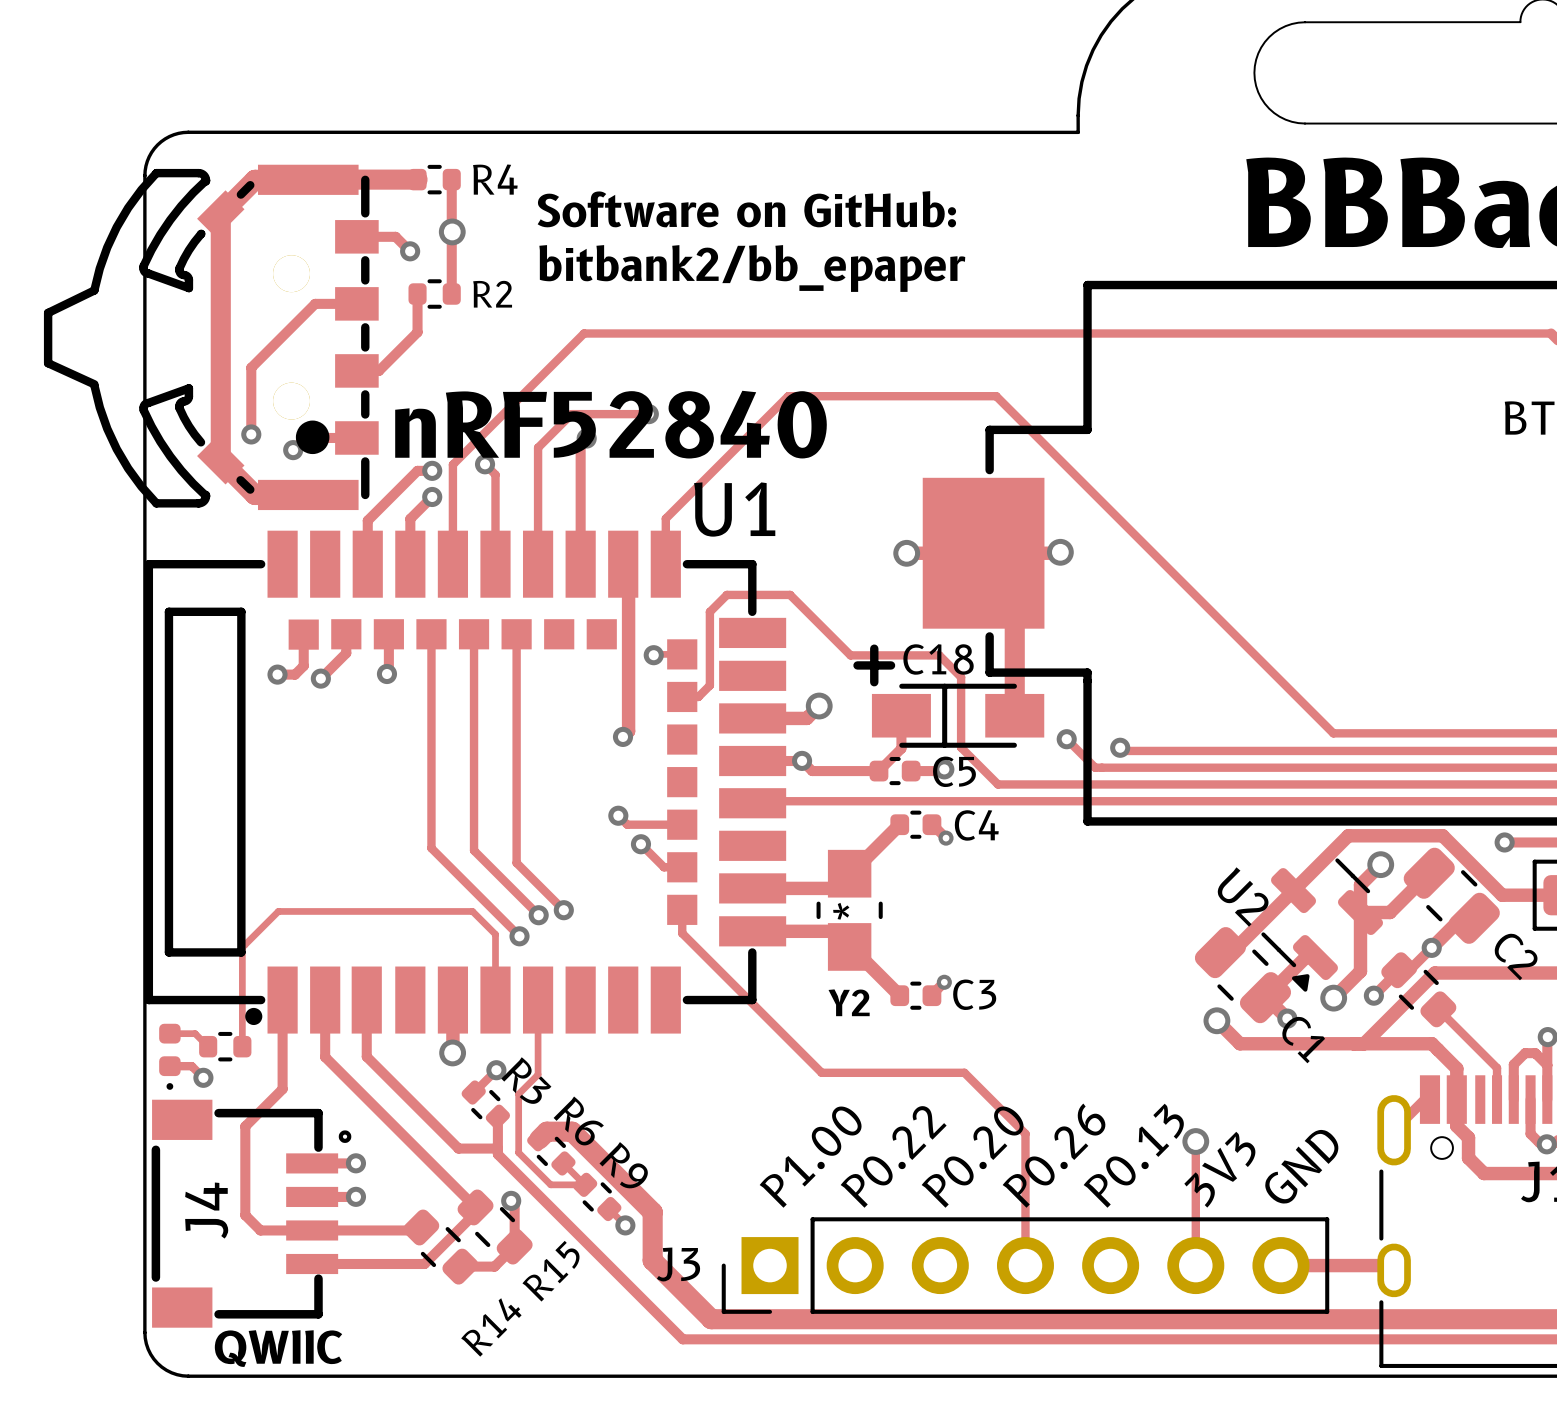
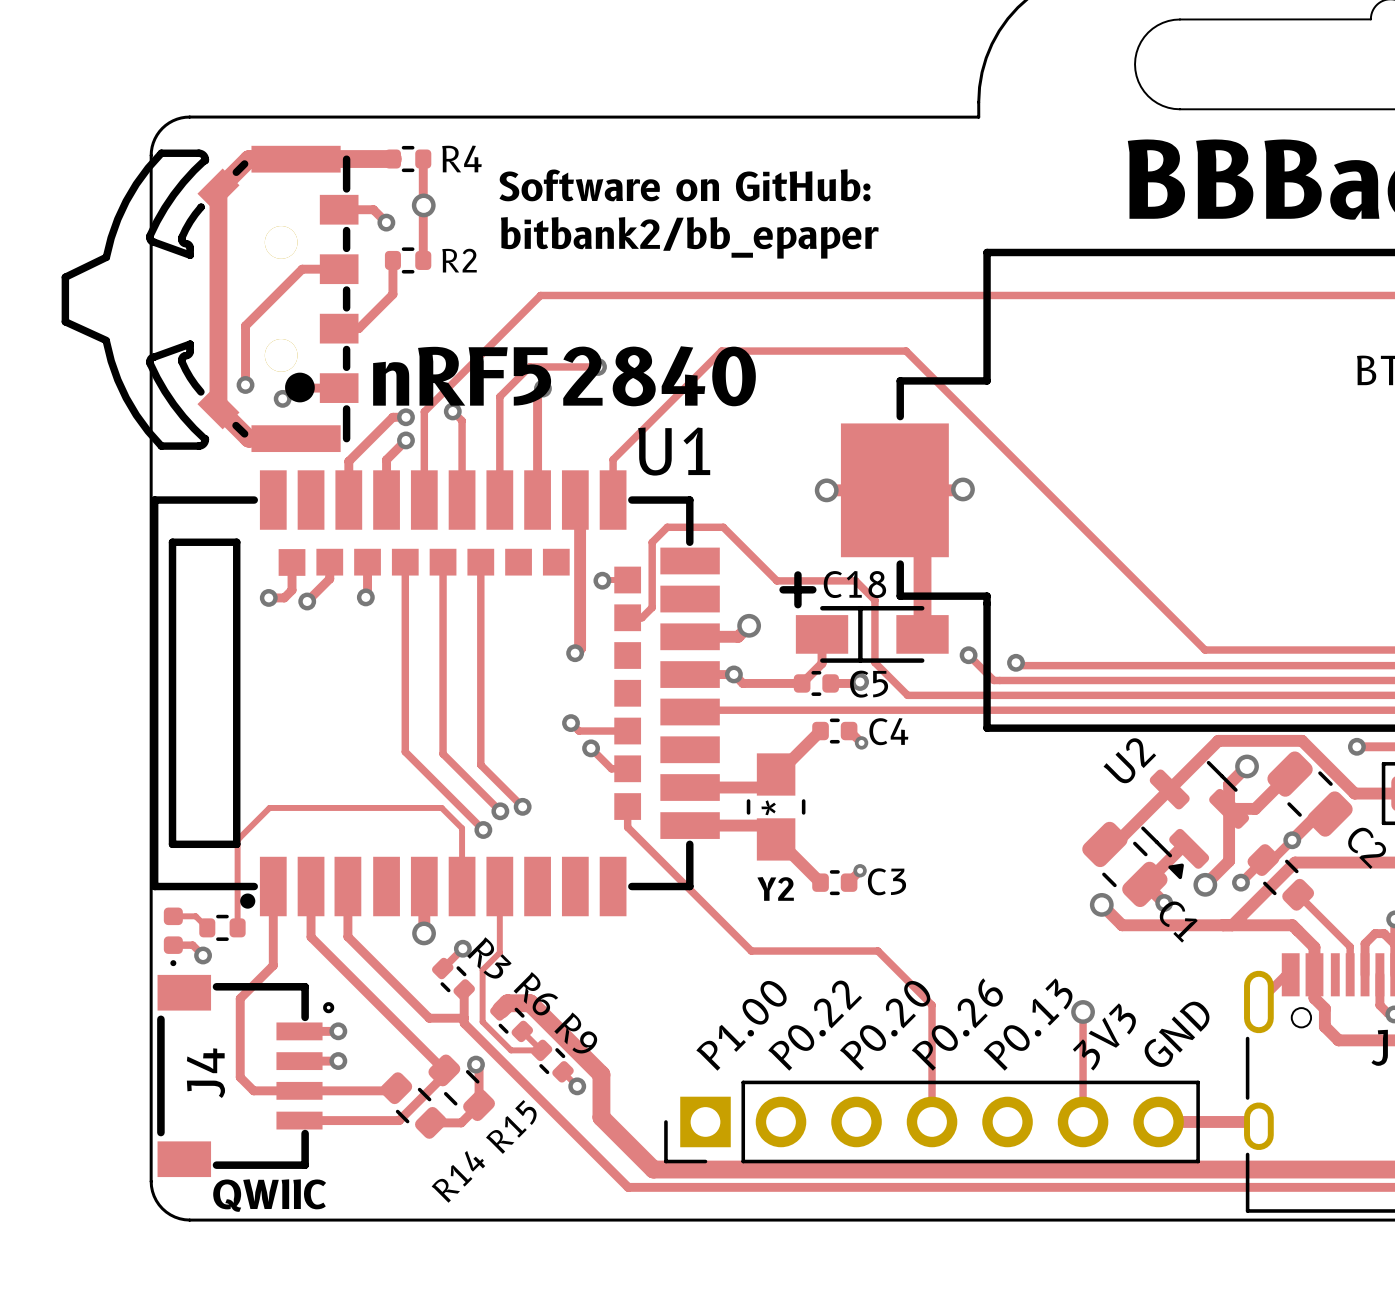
U2 name rotation: 0° (1243, 896) -> 90° counterclockwise (1129, 760)
J3: (1025, 1265) -> none
part: none -> (932, 1121)

